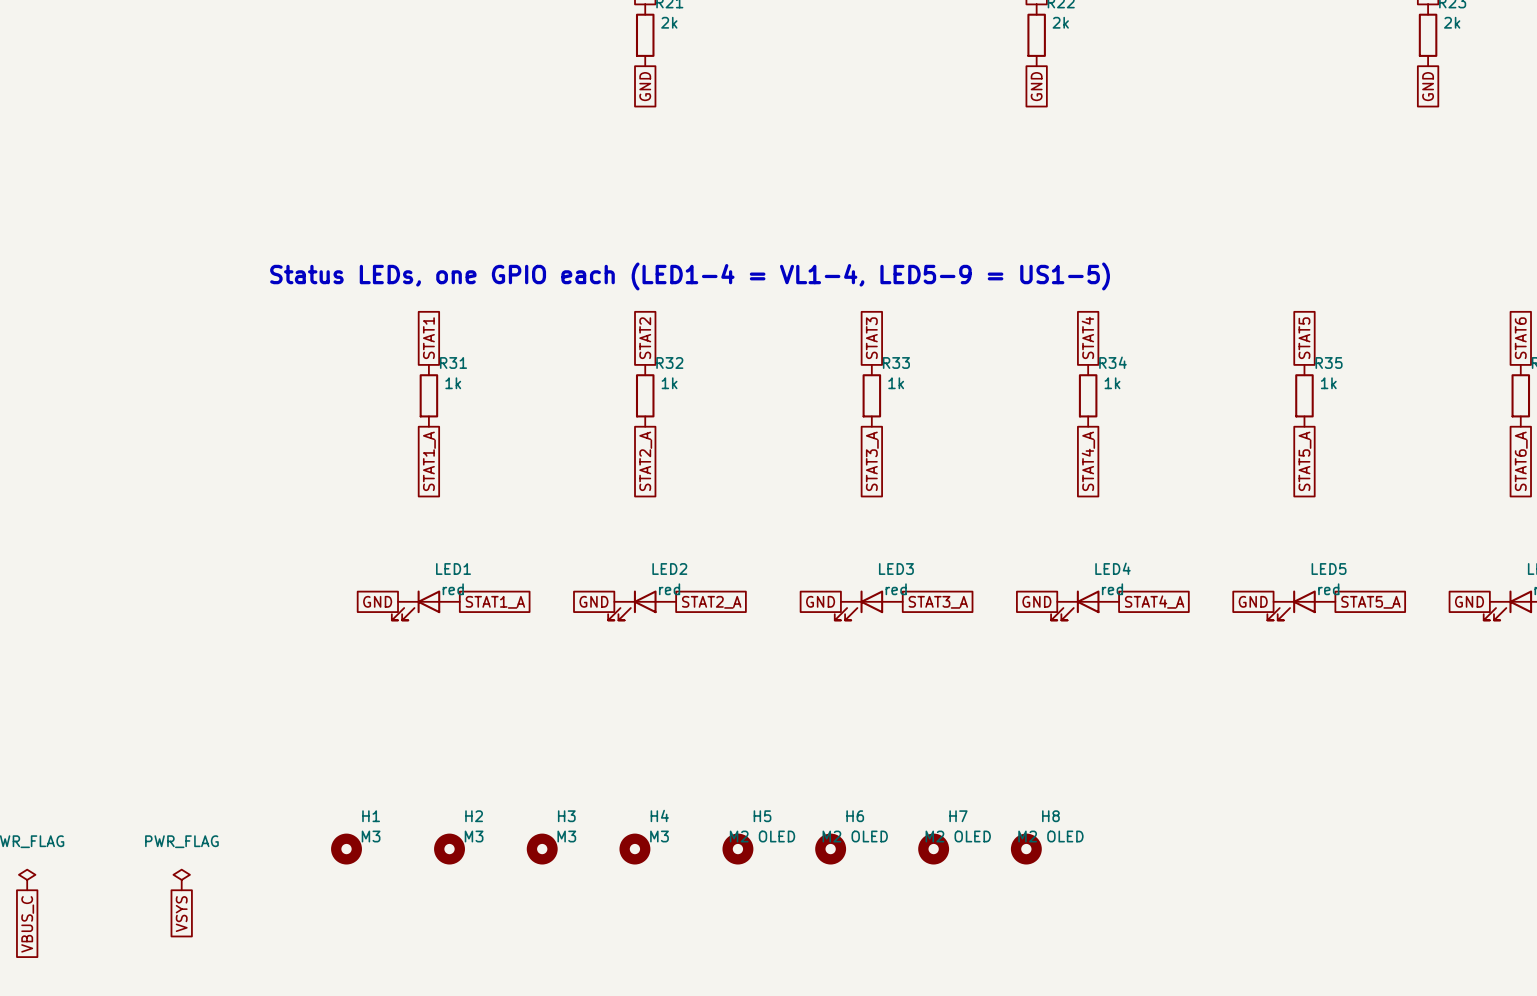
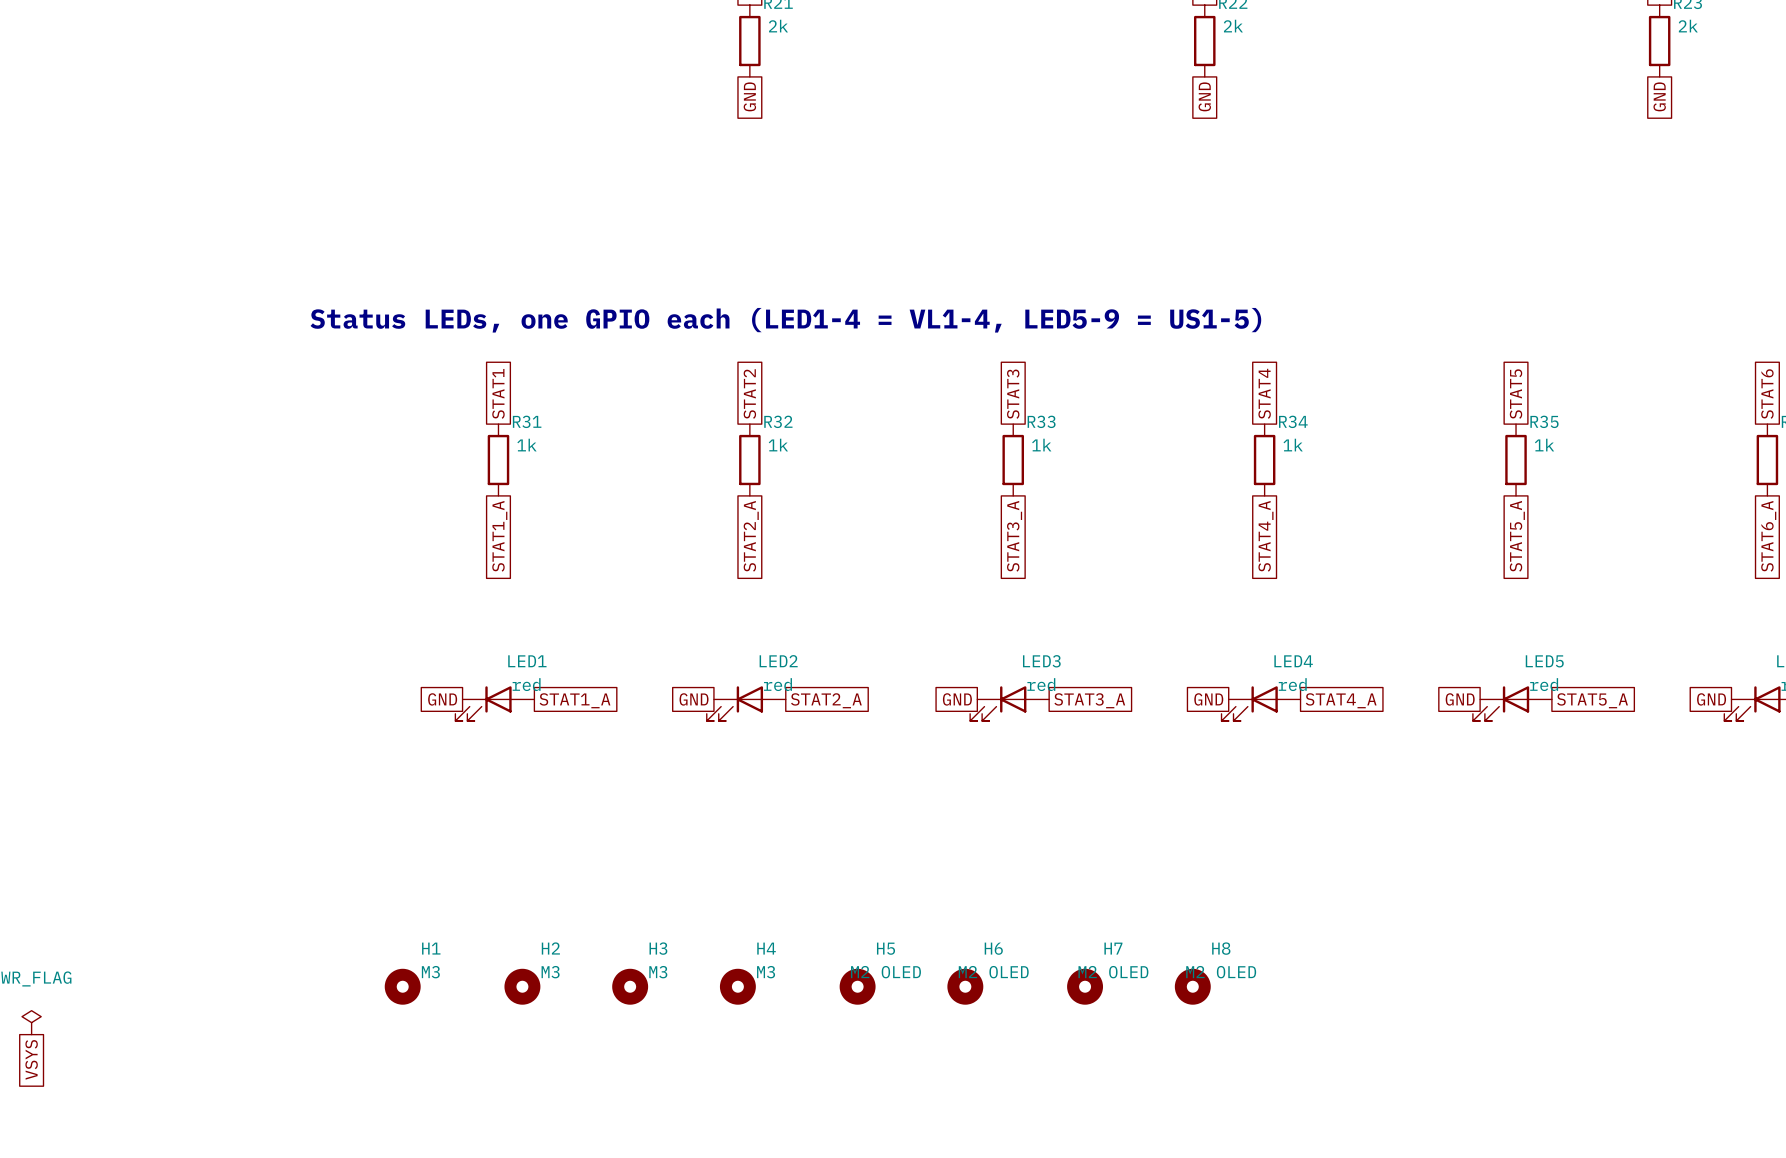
power symbol: PWR_FLAG (181, 879) -> none
global label: VSYS (181, 914) -> none
global label: VBUS_C (27, 924) -> VSYS (31, 1059)

